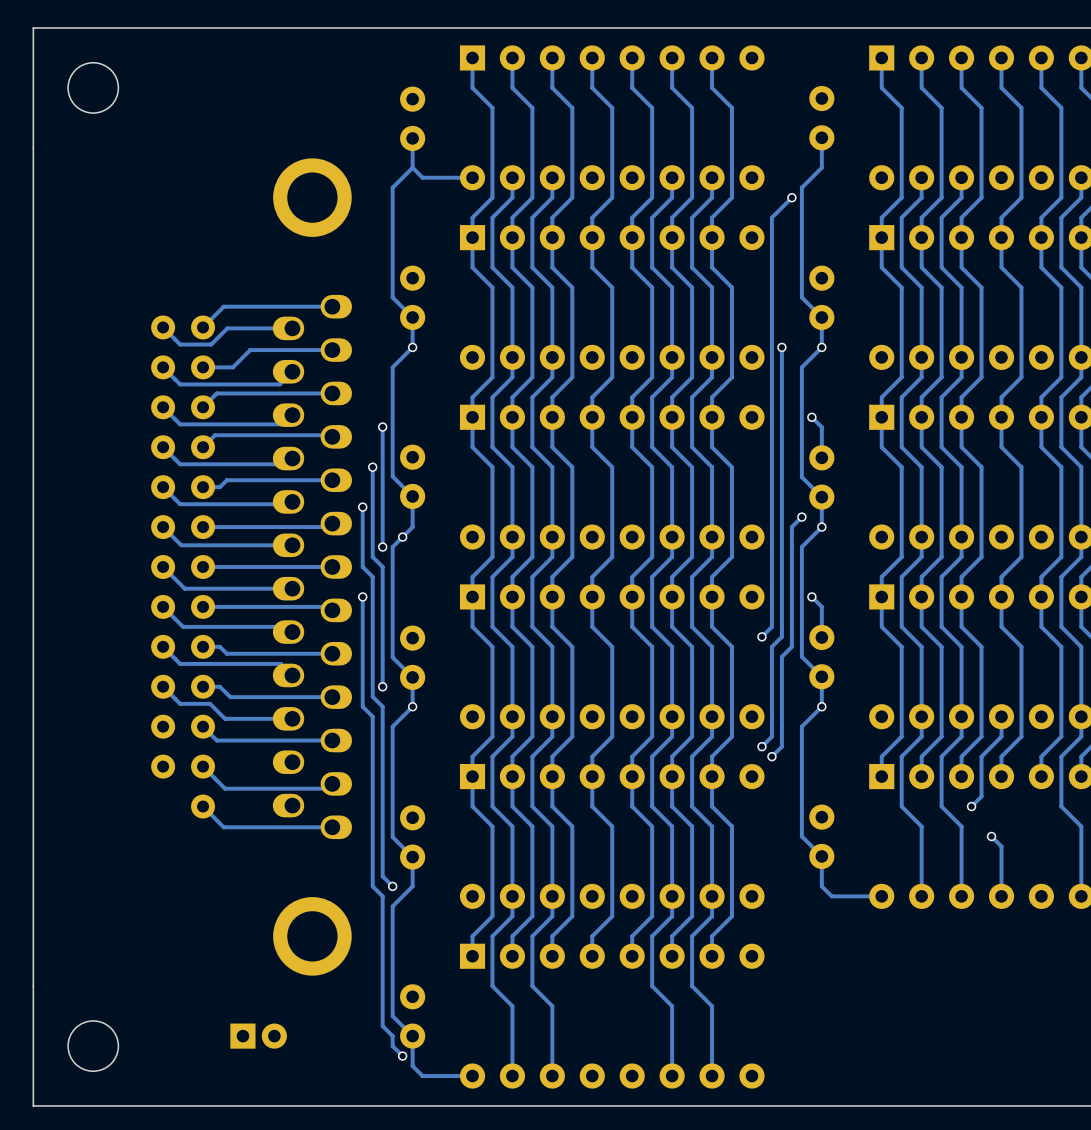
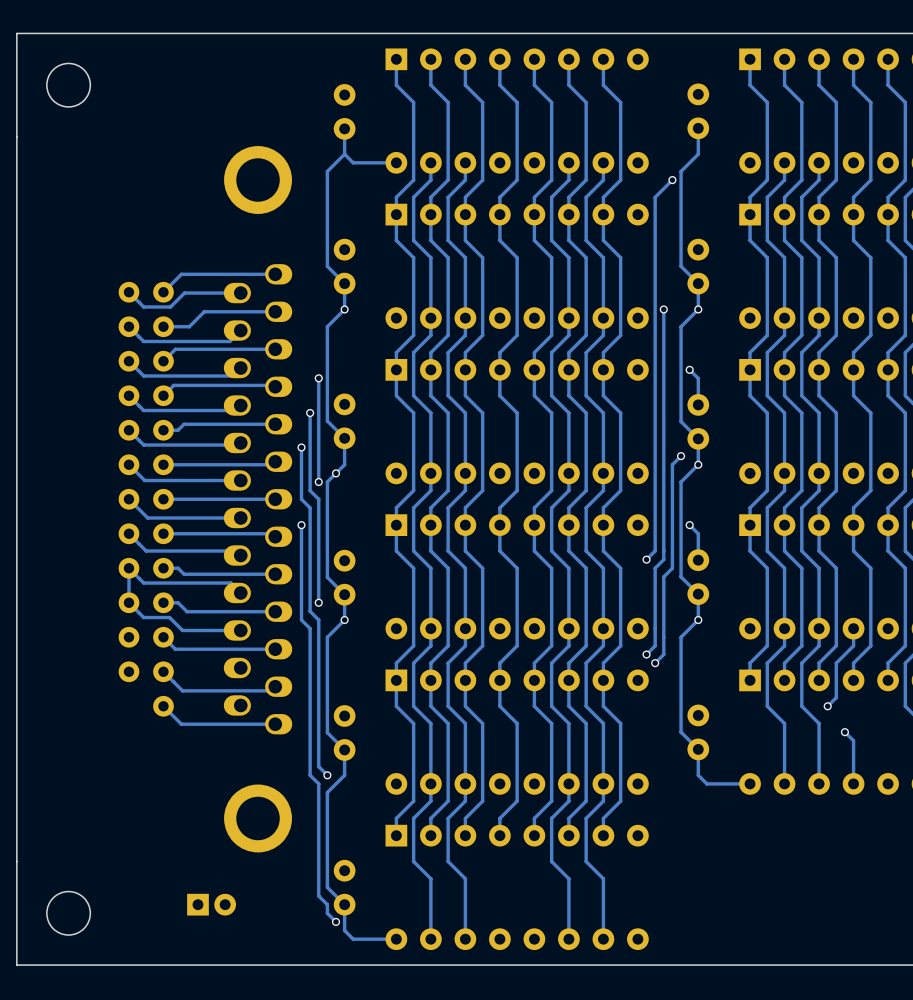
track: none -> (128, 568) (128, 602)

